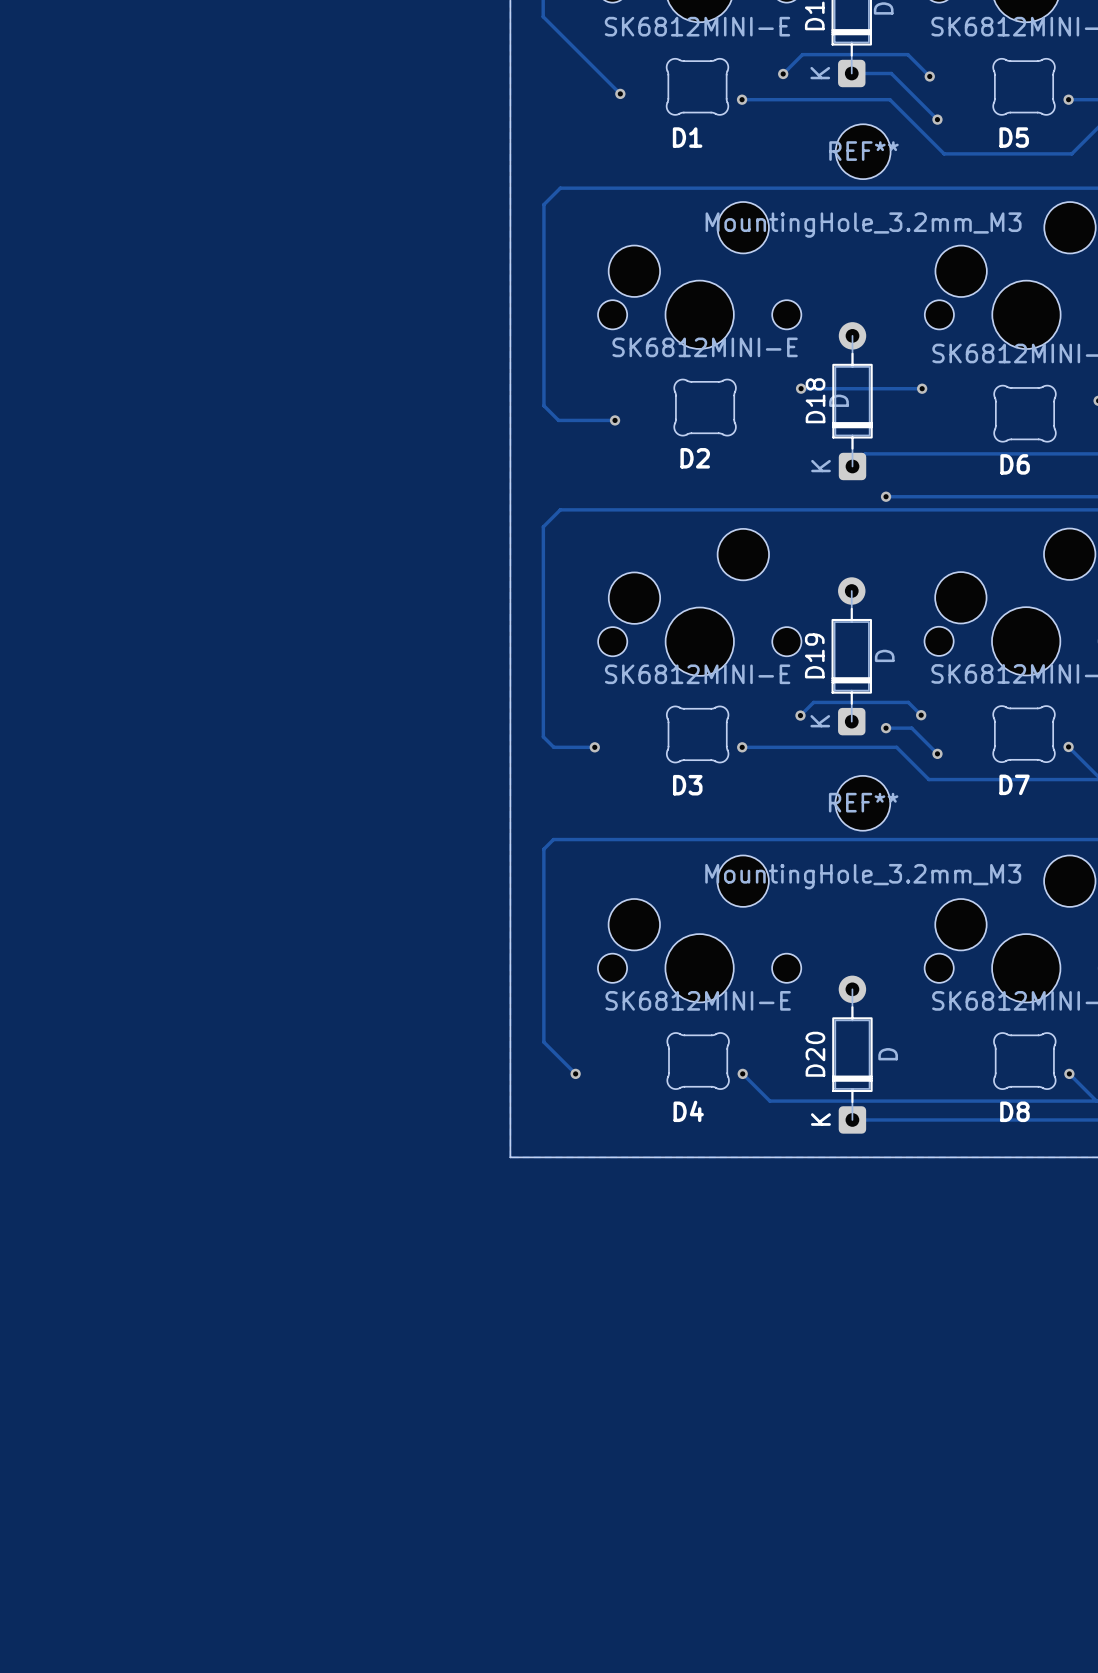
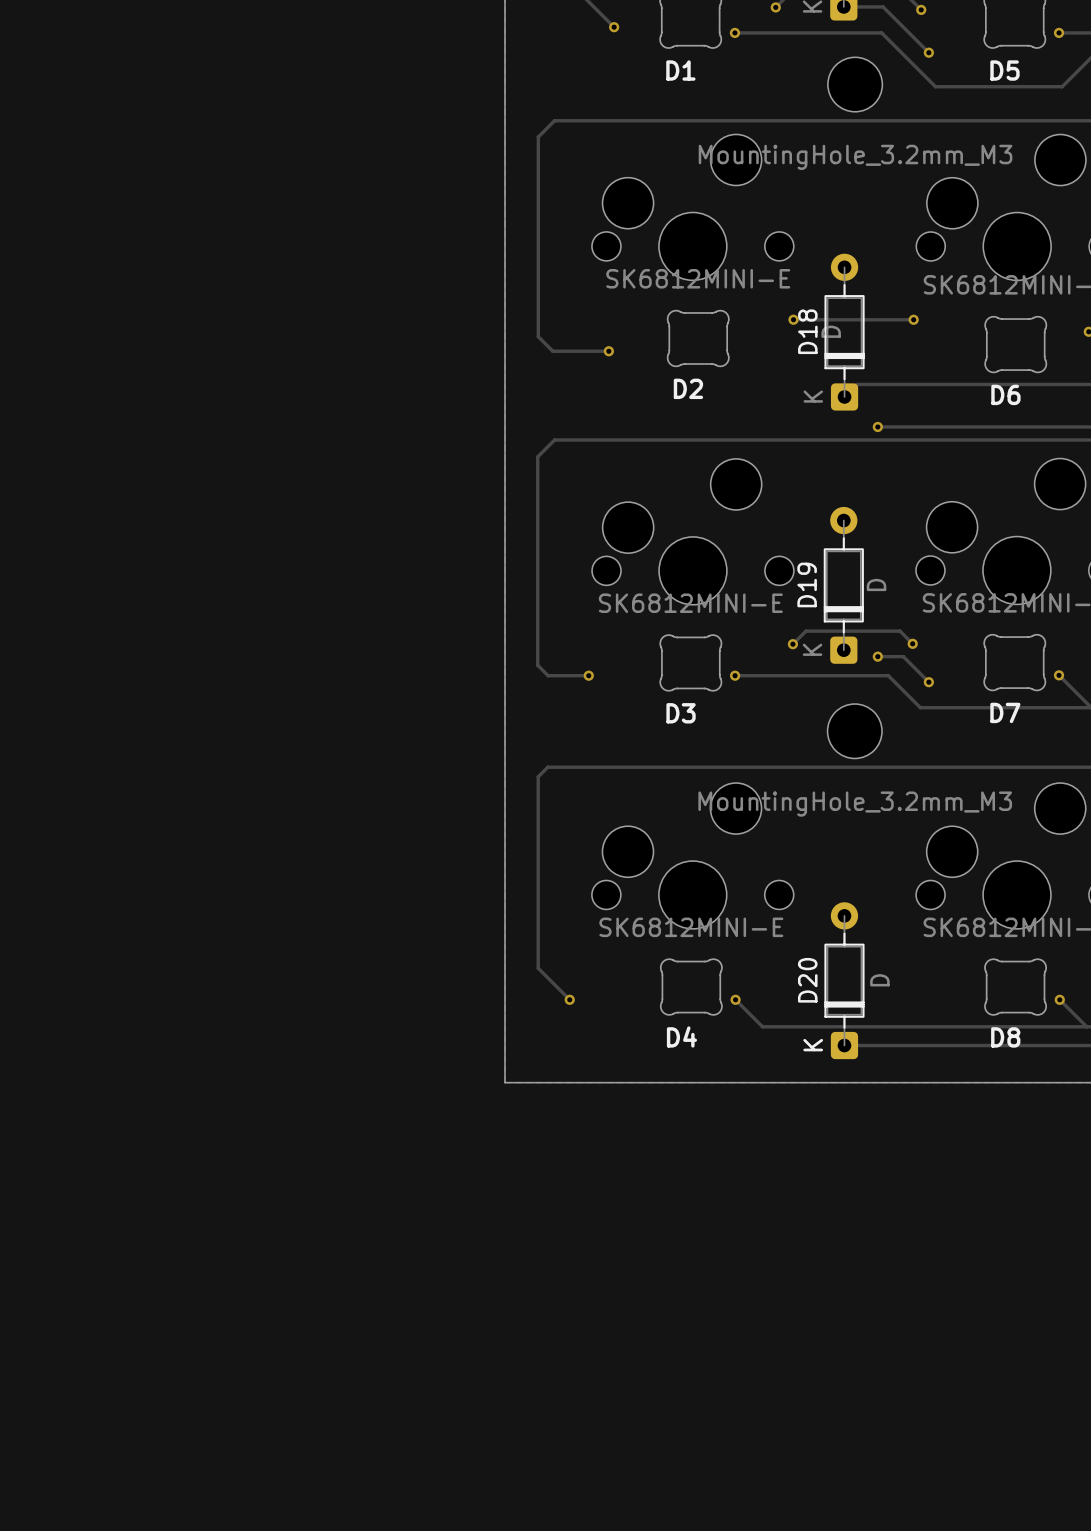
REF** name: REF** (863, 151) -> none
REF** name: REF** (863, 802) -> none

